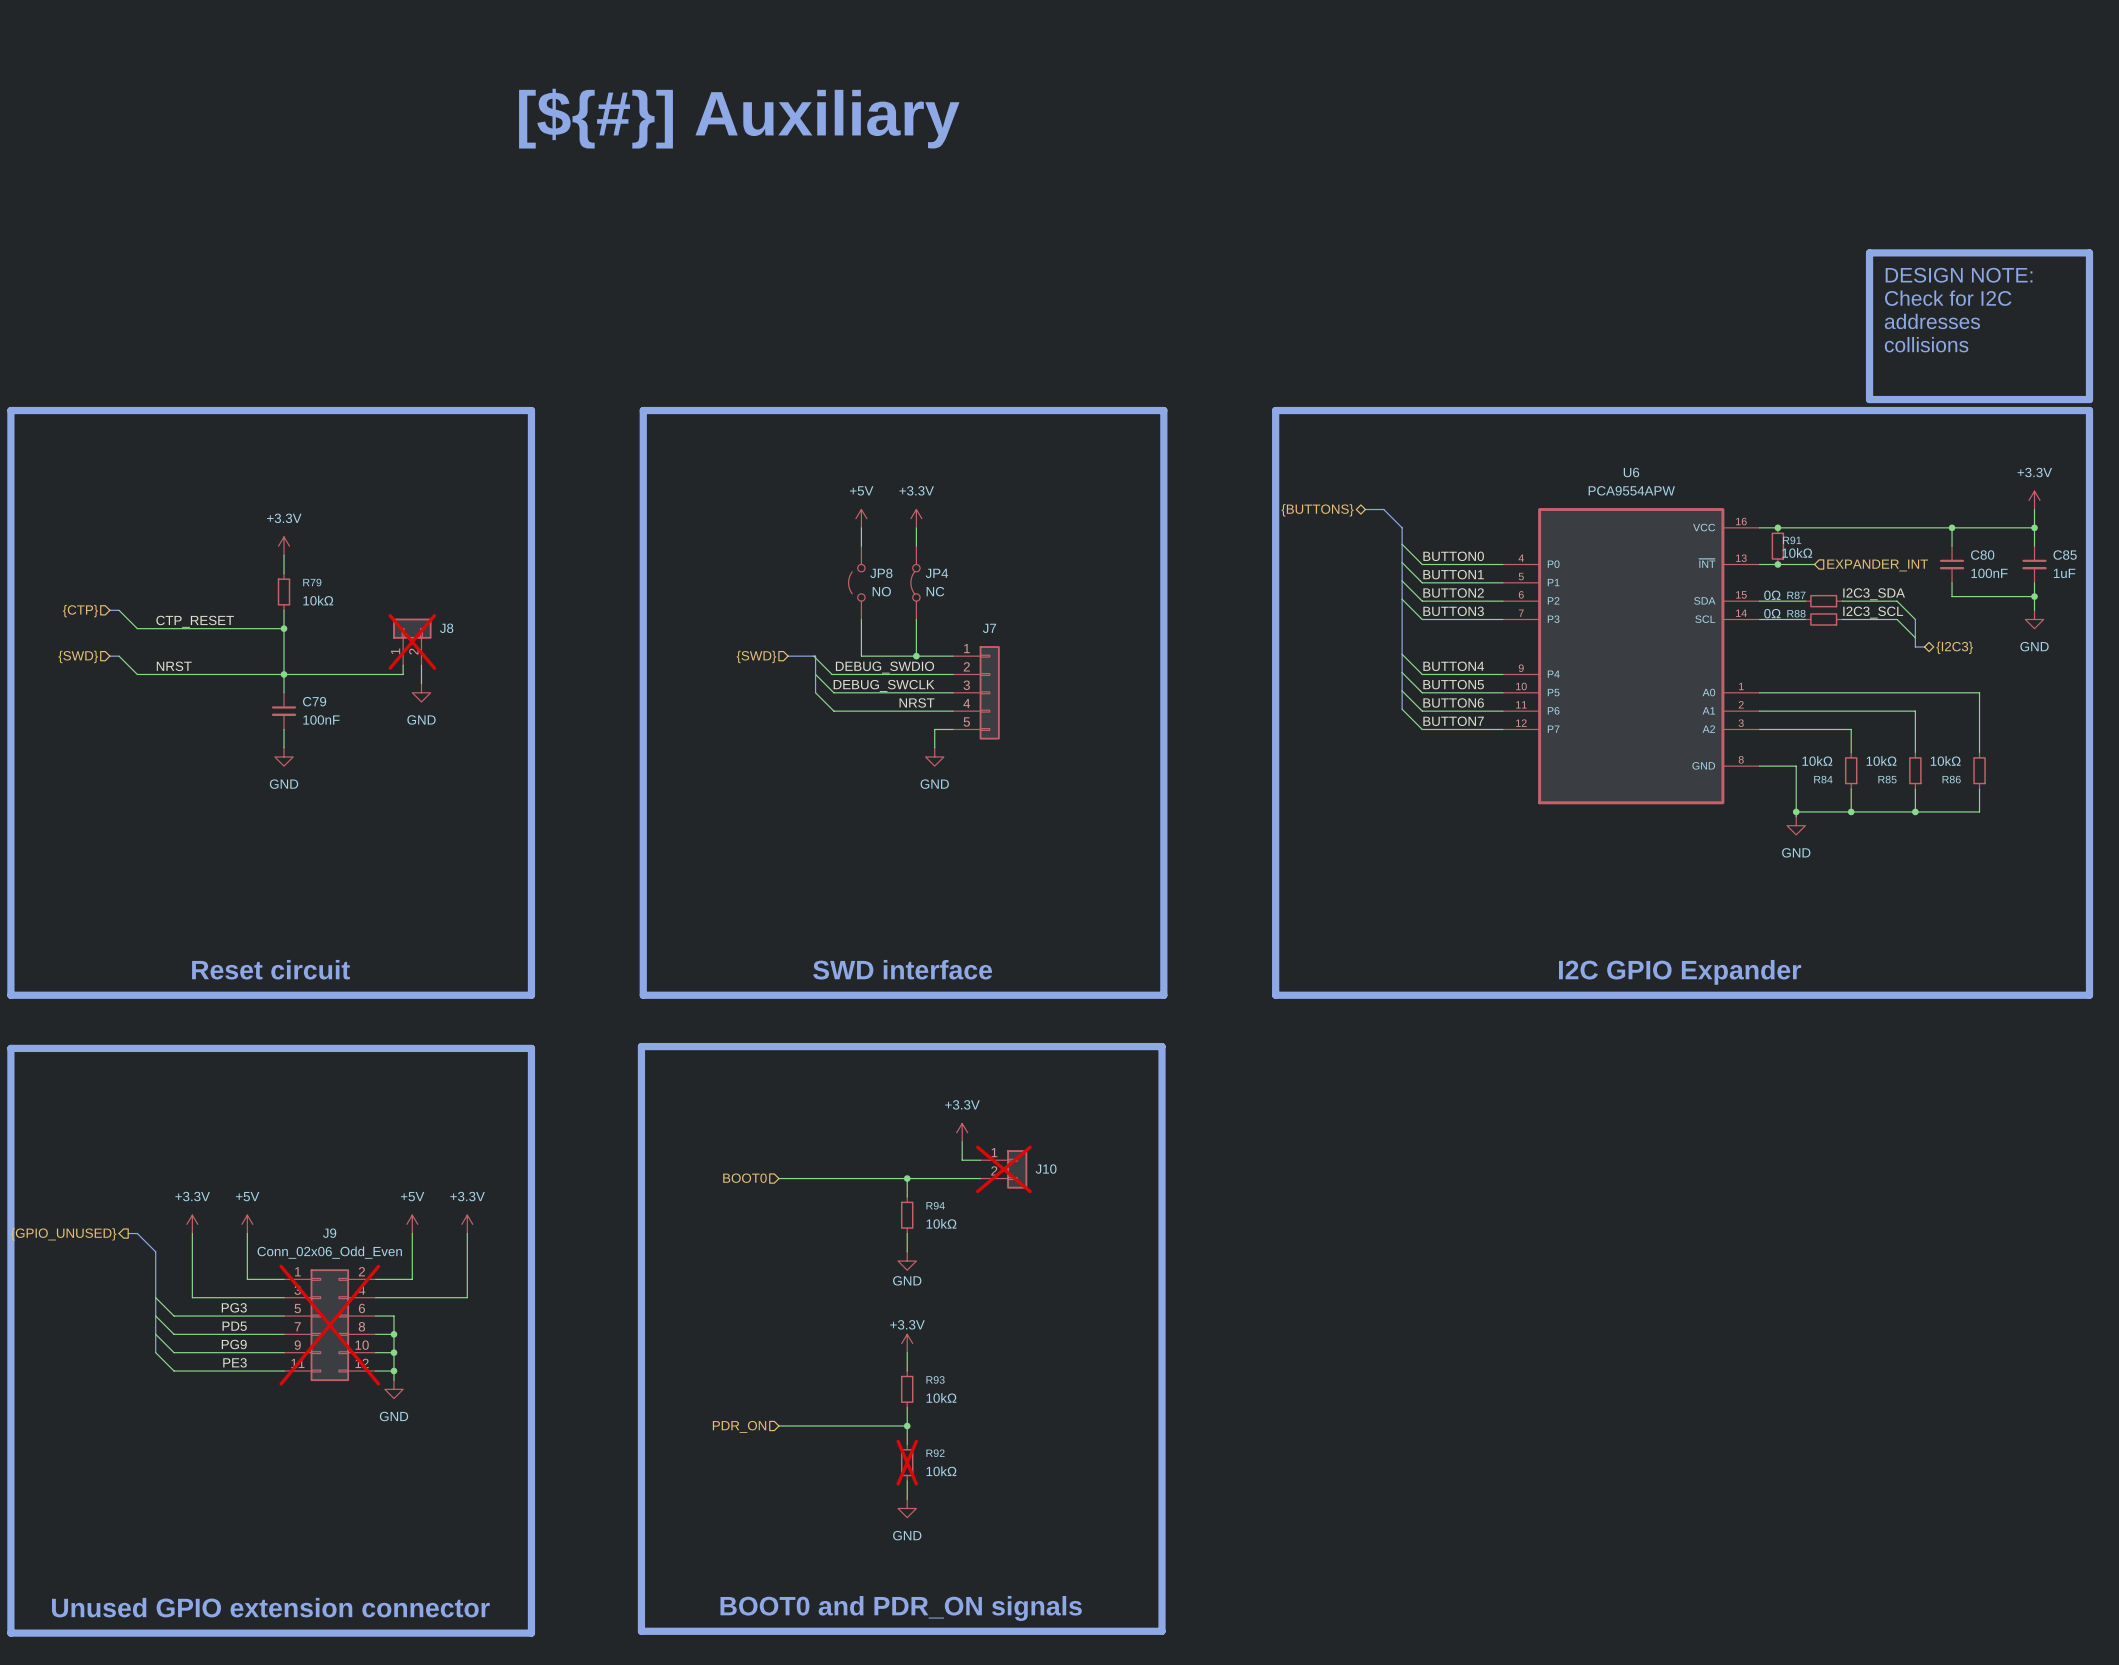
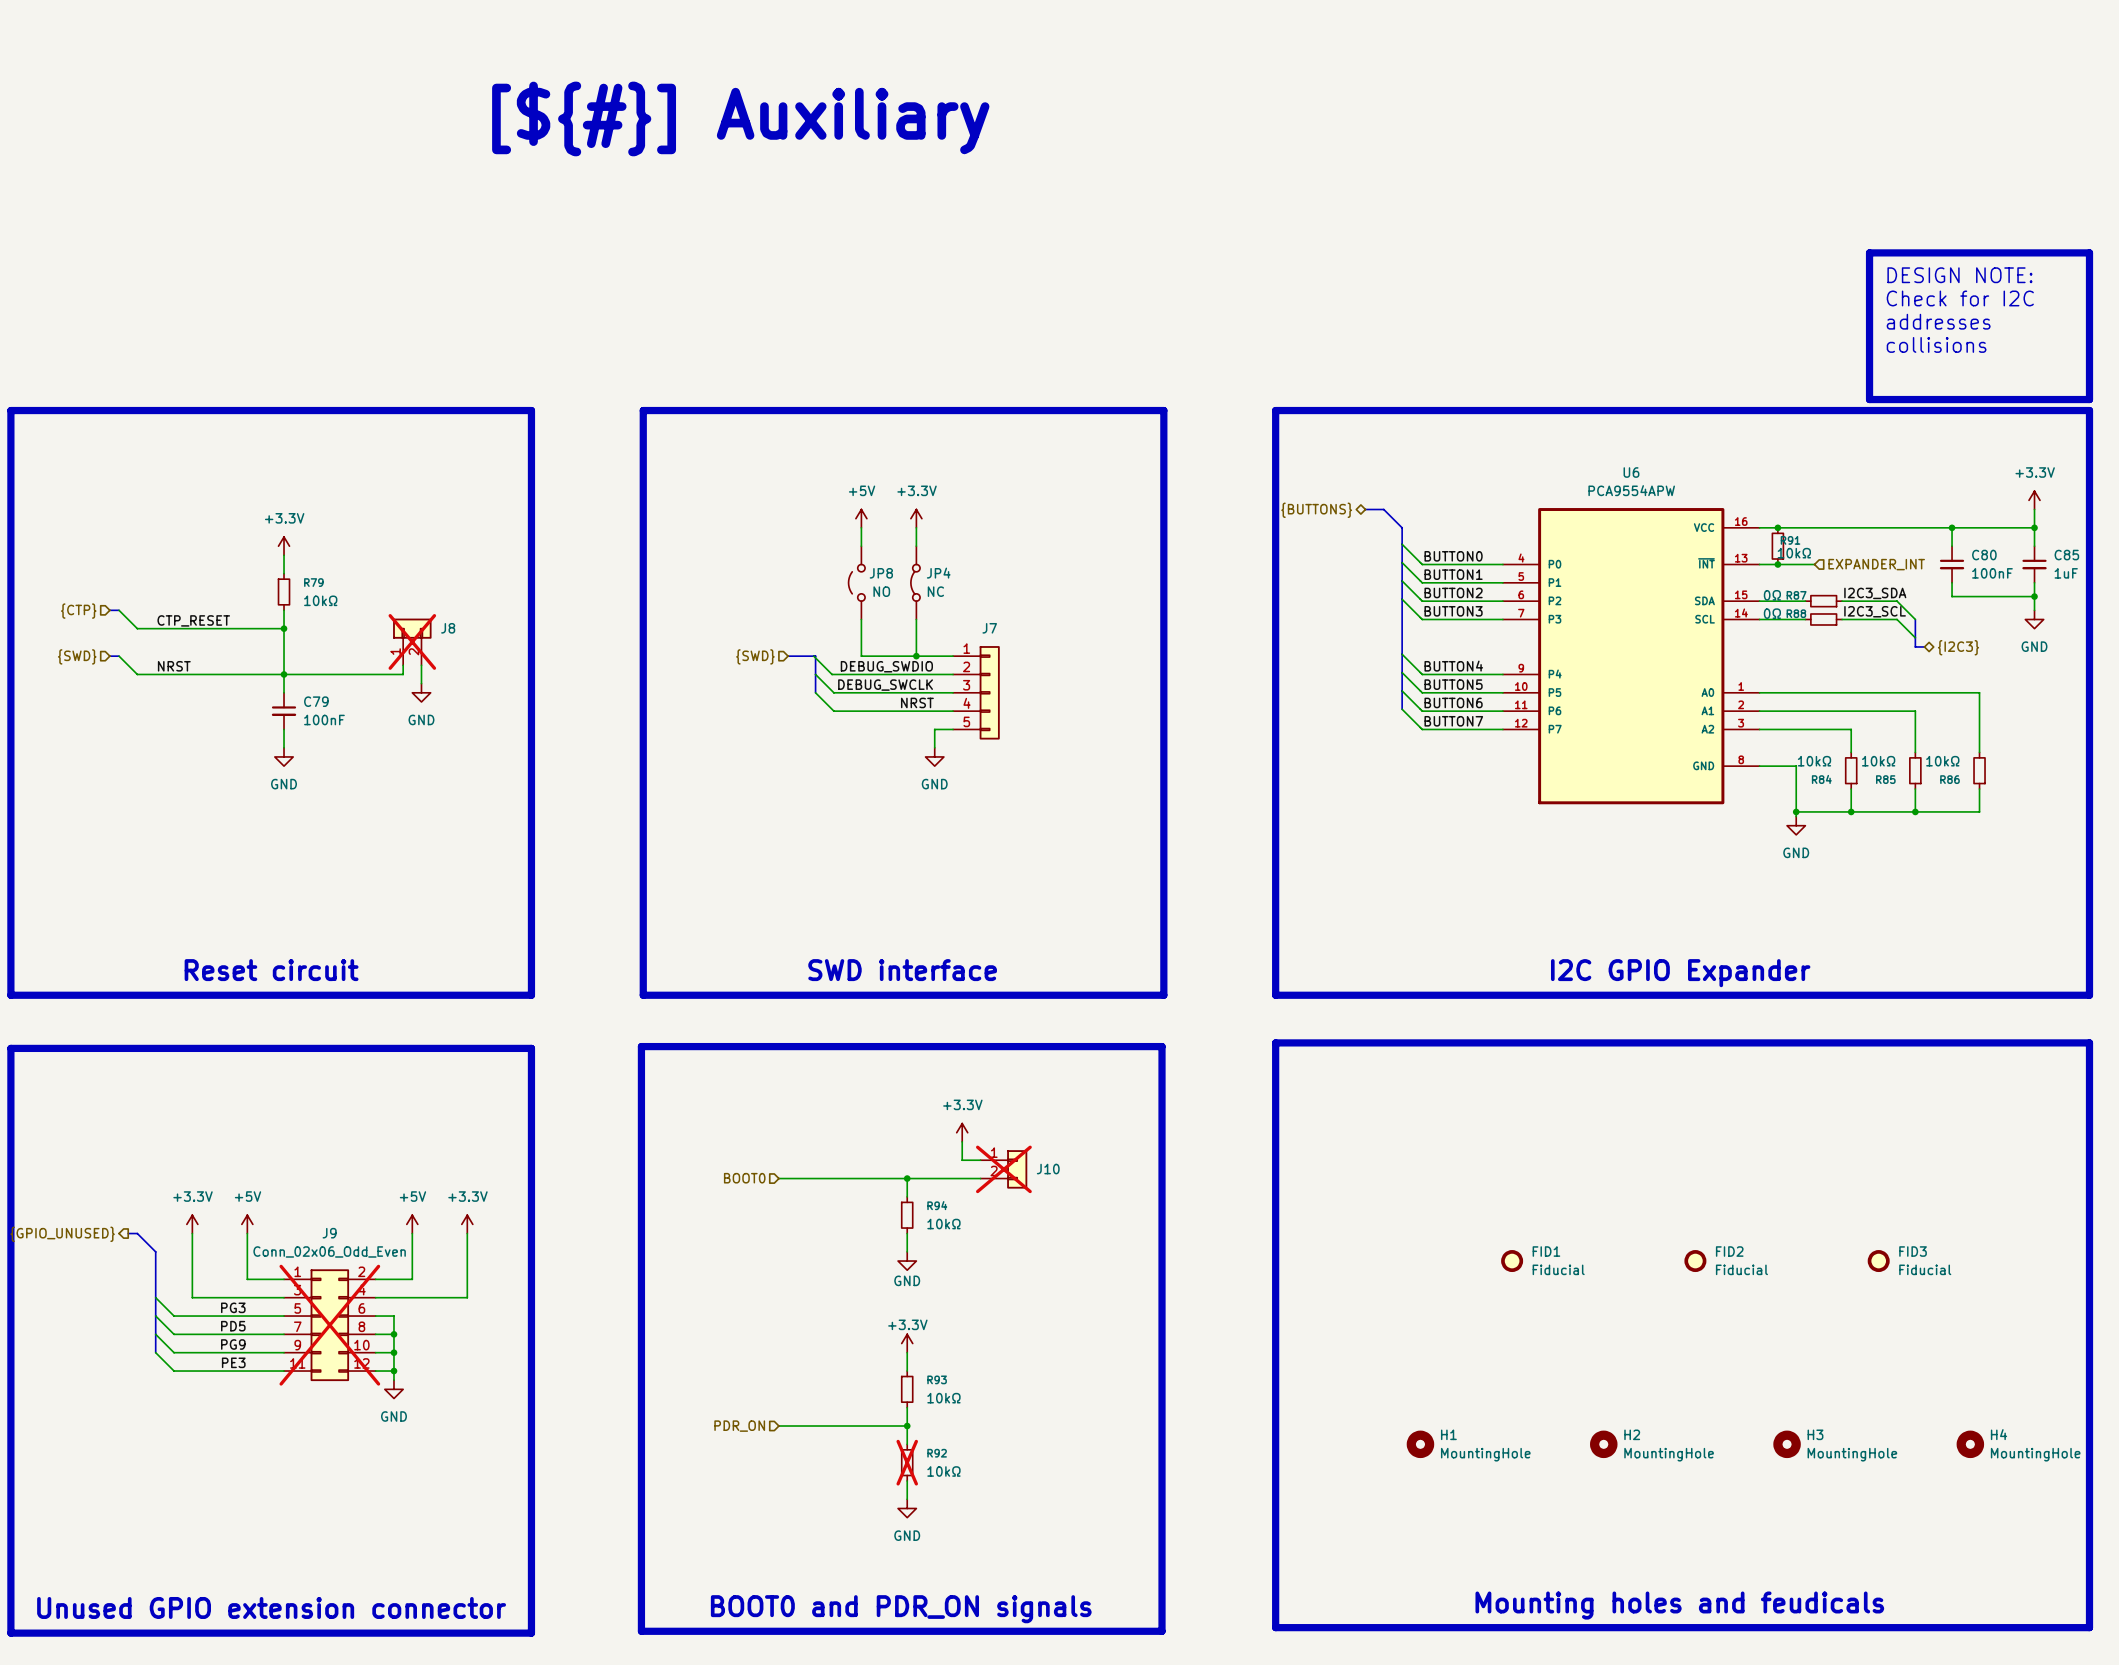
line: none -> (1275, 1042) (2089, 1042) (2089, 1627) (1275, 1627) (1275, 1042)
FID1: none -> Fiducial (1512, 1261)
FID2: none -> Fiducial (1695, 1261)
FID3: none -> Fiducial (1878, 1261)
H1: none -> MountingHole (1420, 1444)
H2: none -> MountingHole (1603, 1444)
H3: none -> MountingHole (1787, 1444)
H4: none -> MountingHole (1970, 1444)
text: none -> Mounting holes and feudicals (1679, 1605)

